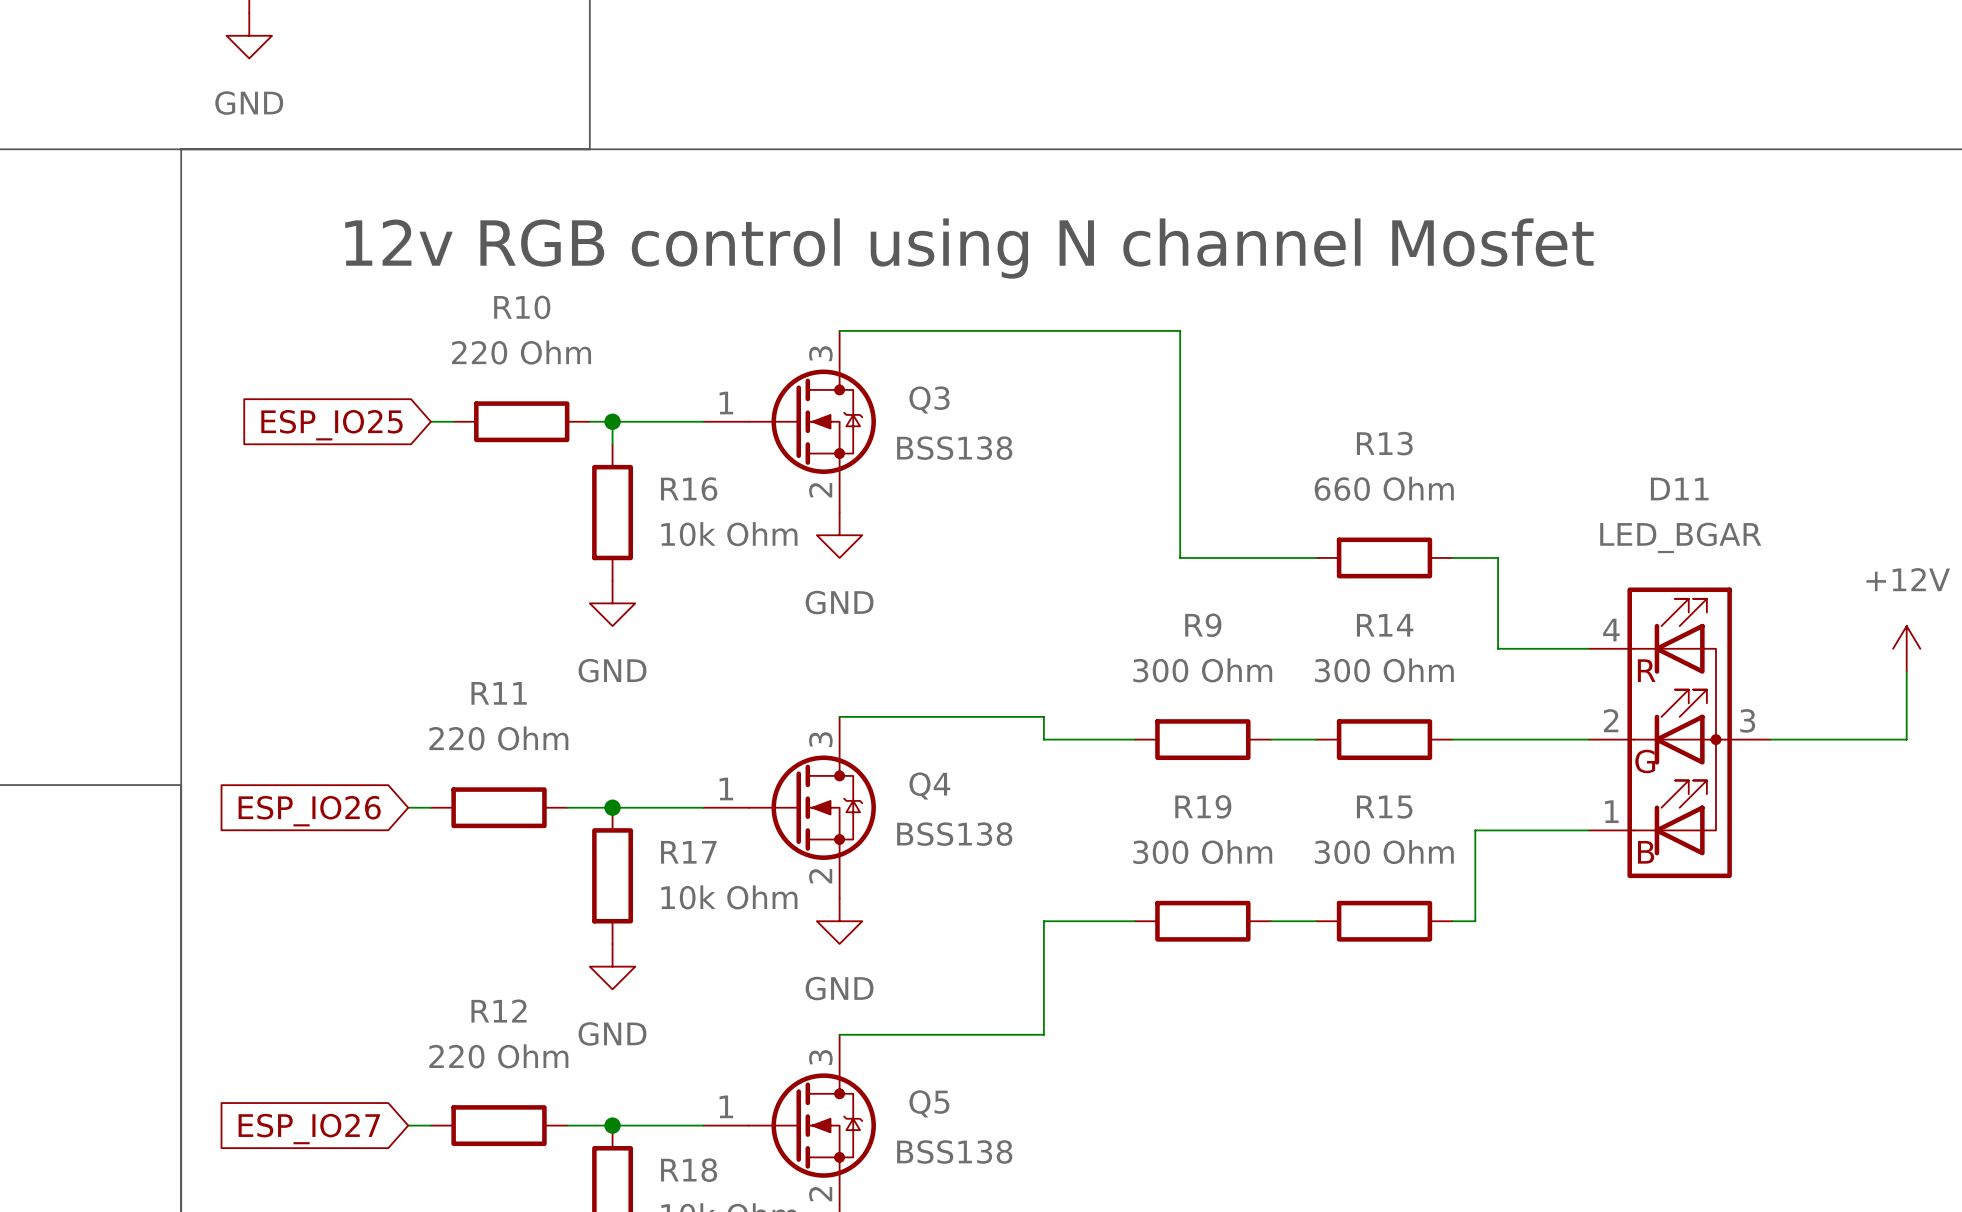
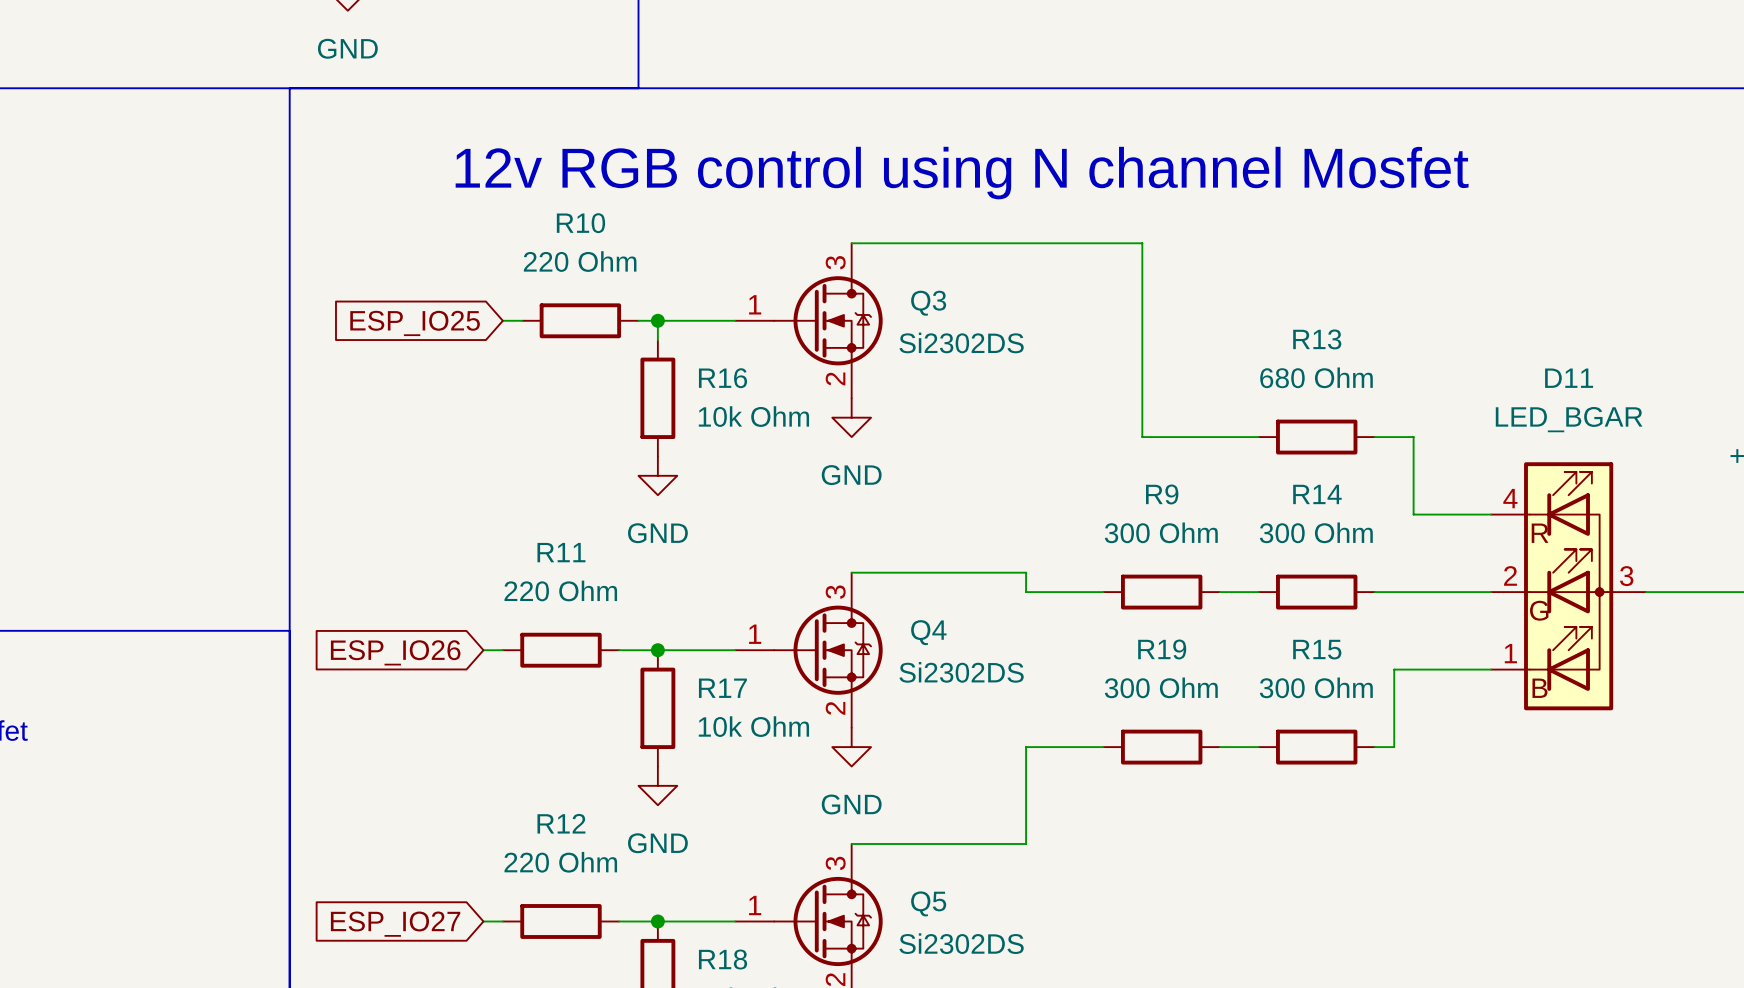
Q3 value: BSS138 (954, 448) -> Si2302DS (961, 342)
R13 value: 660 Ohm (1384, 488) -> 680 Ohm (1316, 377)
Q4 value: BSS138 (954, 834) -> Si2302DS (961, 672)
Q5 value: BSS138 (954, 1152) -> Si2302DS (961, 943)

